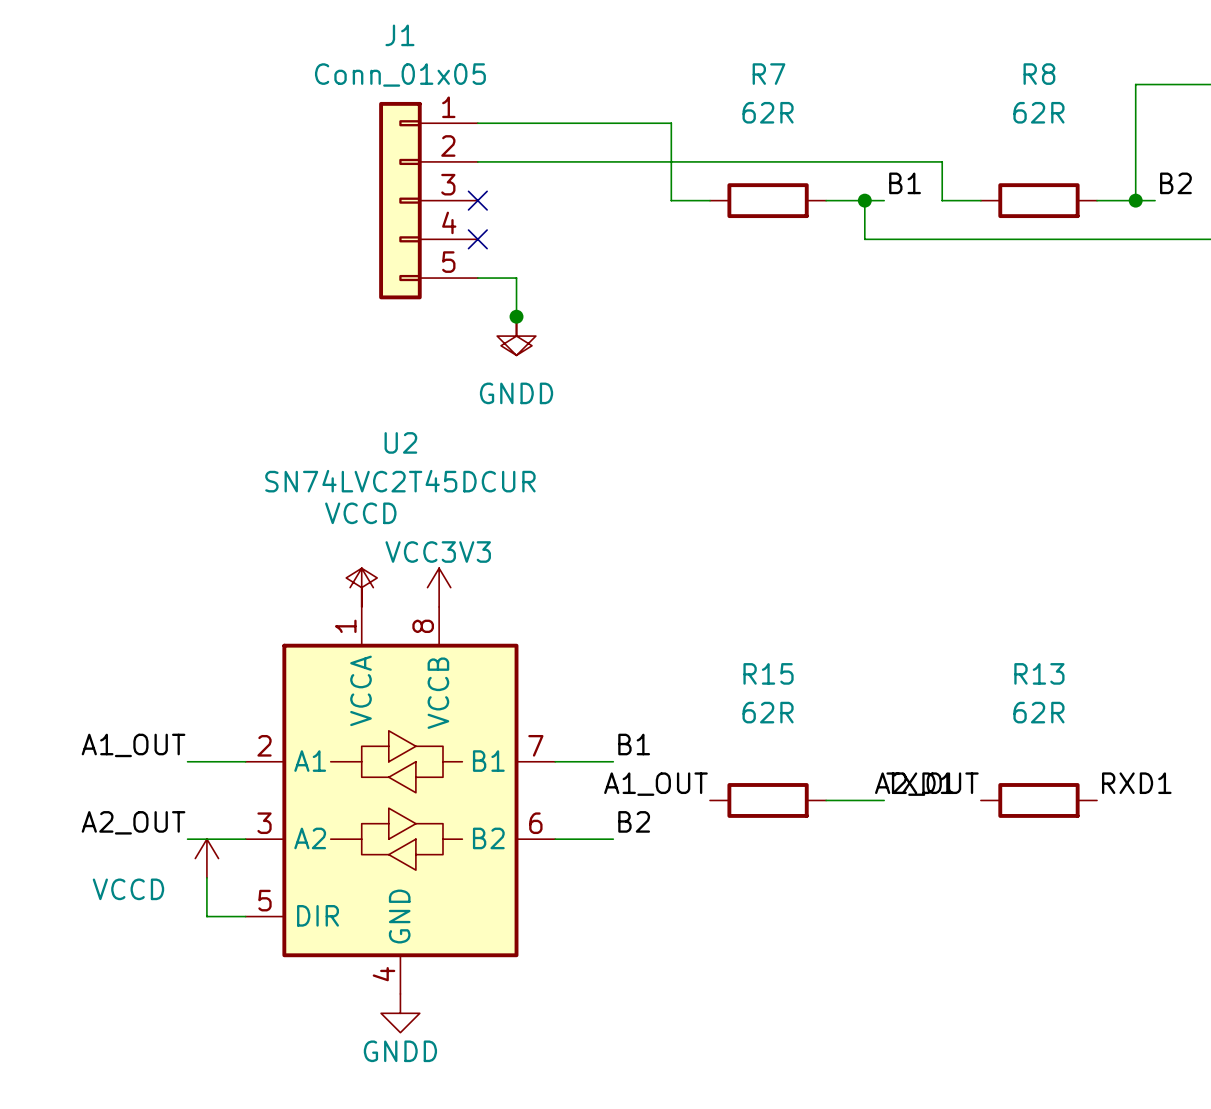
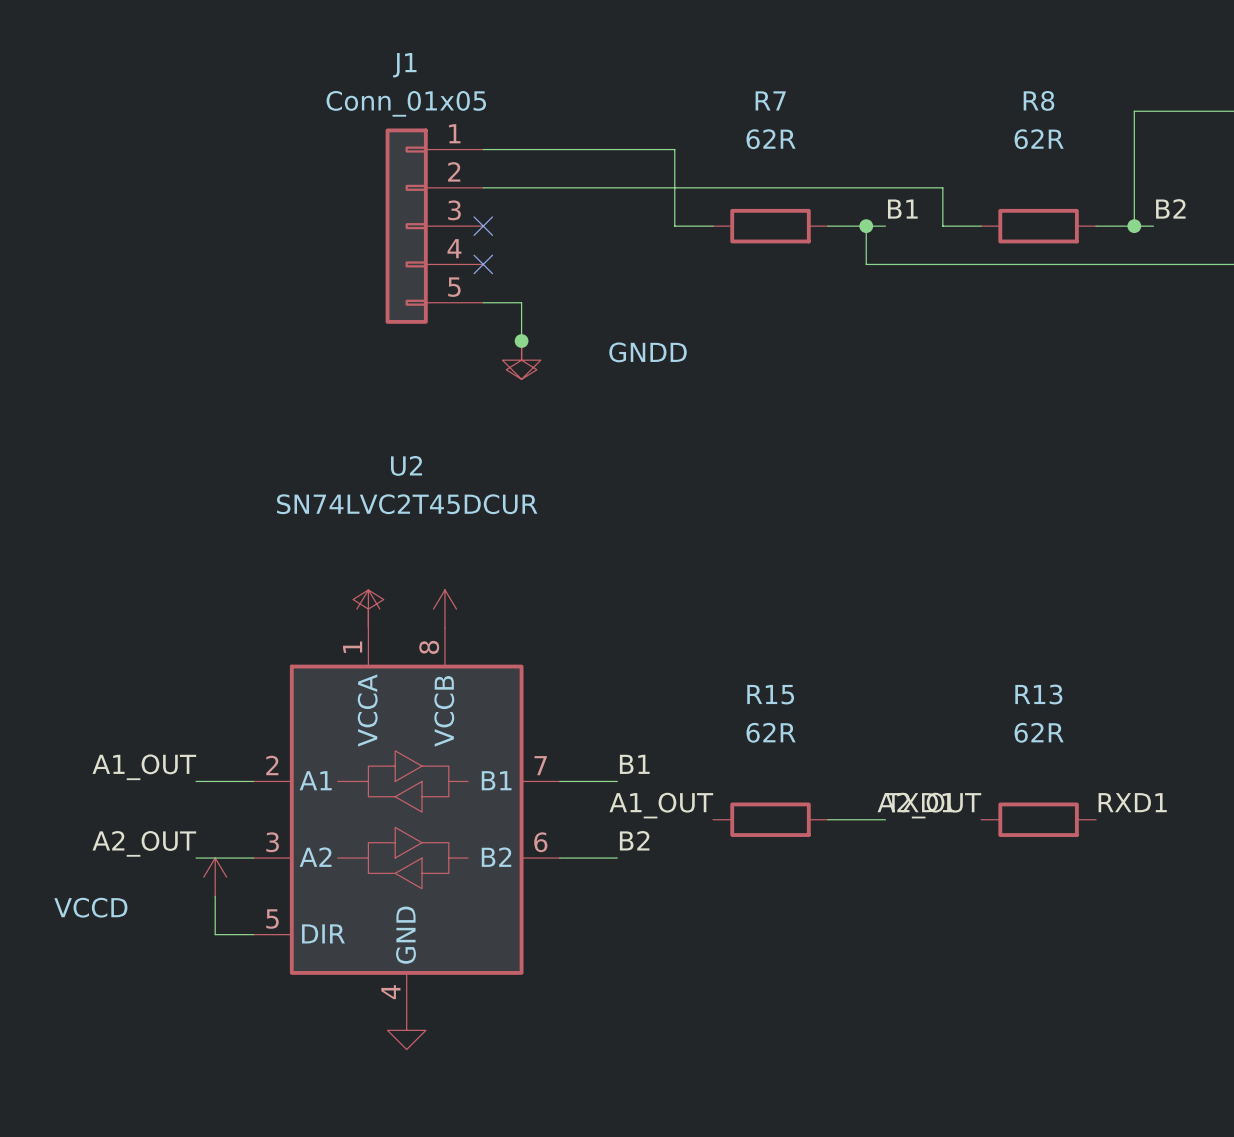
power symbol text position: GNDD (516, 393) -> GNDD (648, 352)
power symbol text: VCCD (360, 513) -> none
power symbol text: VCC3V3 (438, 552) -> none
power symbol text position: VCCD (128, 889) -> VCCD (90, 907)
power symbol text: GNDD (400, 1051) -> none

